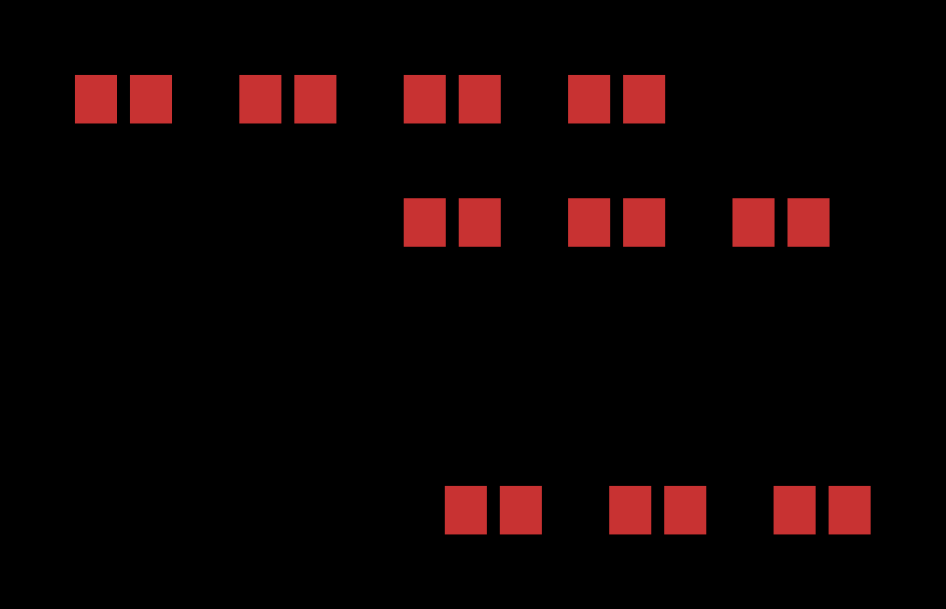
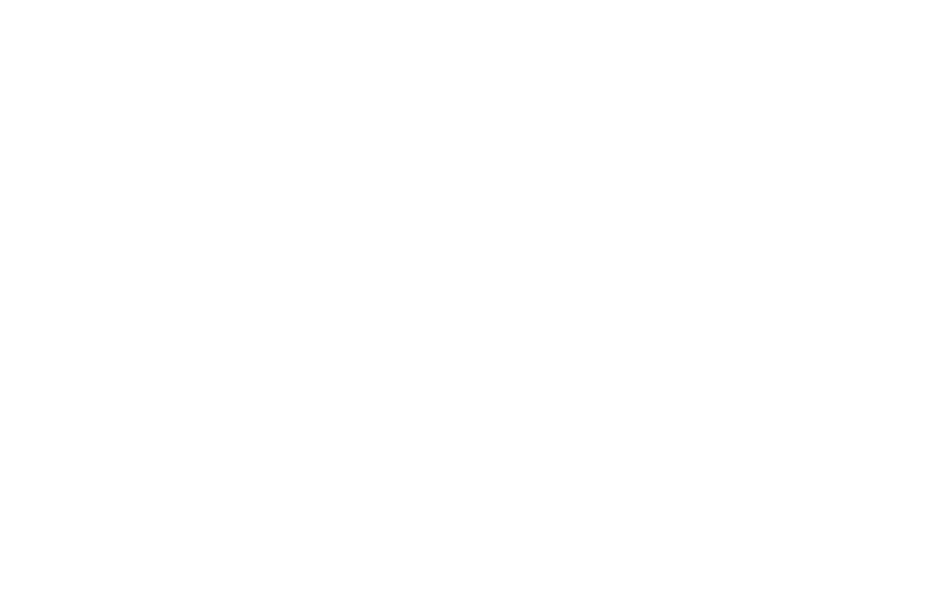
part: (123, 99) -> none
part: (287, 99) -> none
part: (452, 99) -> none
part: (616, 99) -> none
part: (452, 222) -> none
part: (616, 222) -> none
part: (781, 222) -> none
part: (493, 510) -> none
part: (657, 510) -> none
part: (822, 510) -> none

